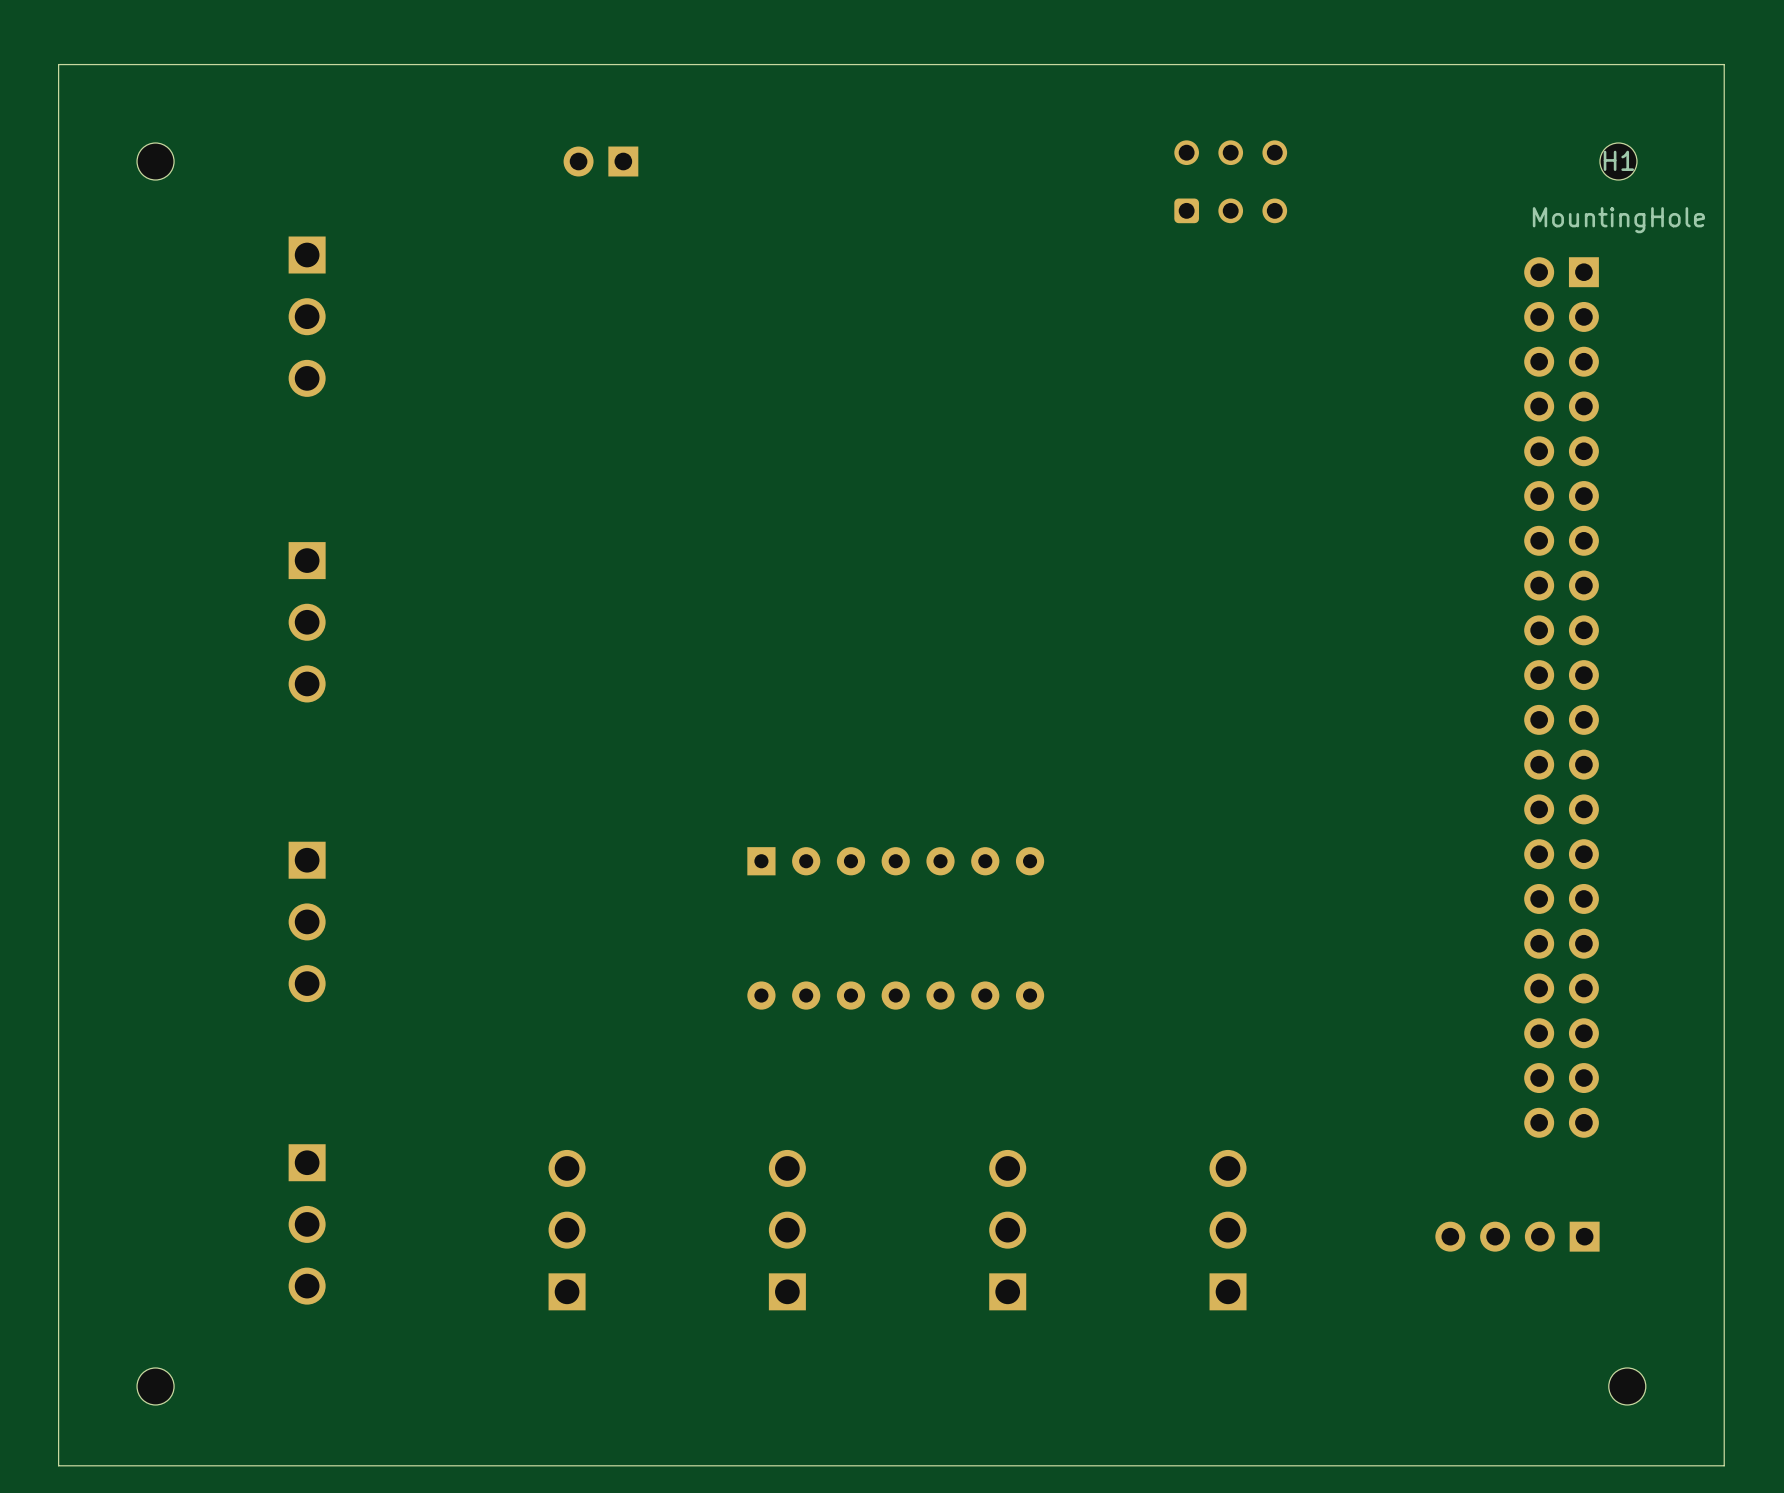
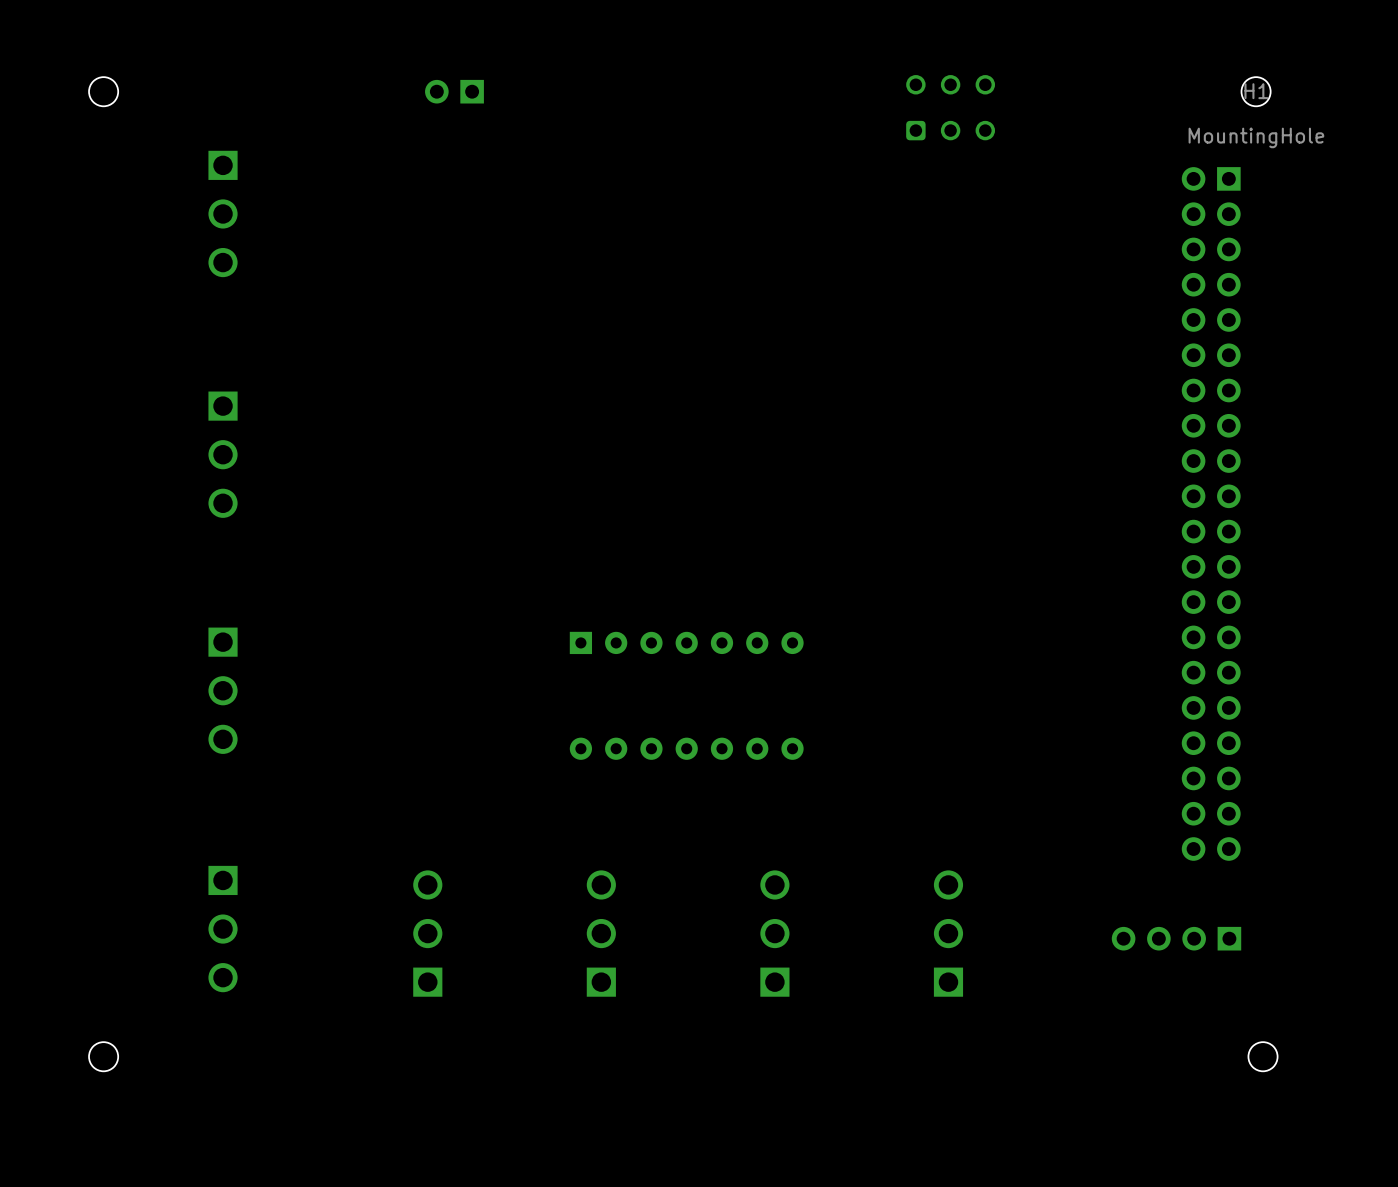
board edge: (1724, 64) (58, 64) (58, 1465) (1724, 1465) (1724, 64) -> none

